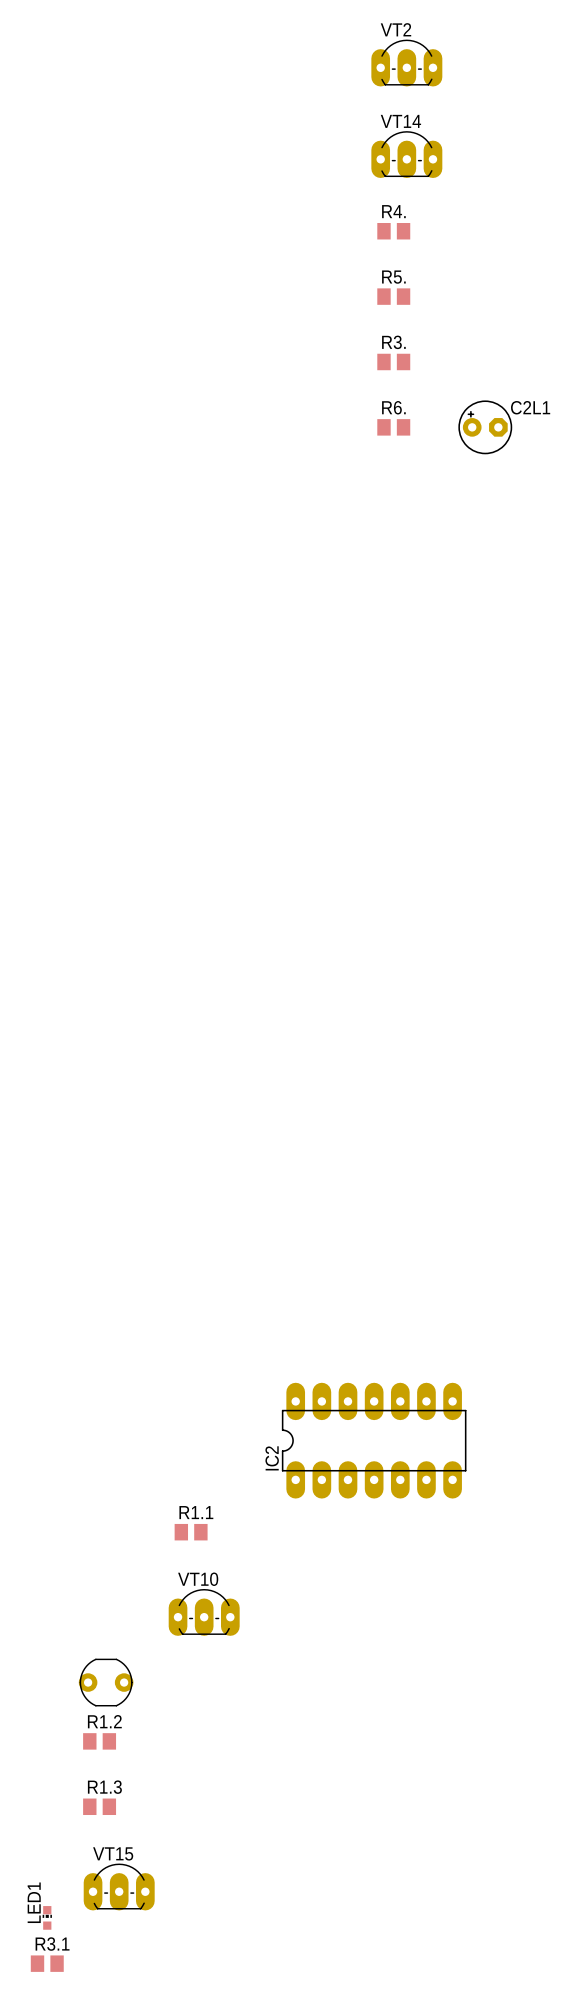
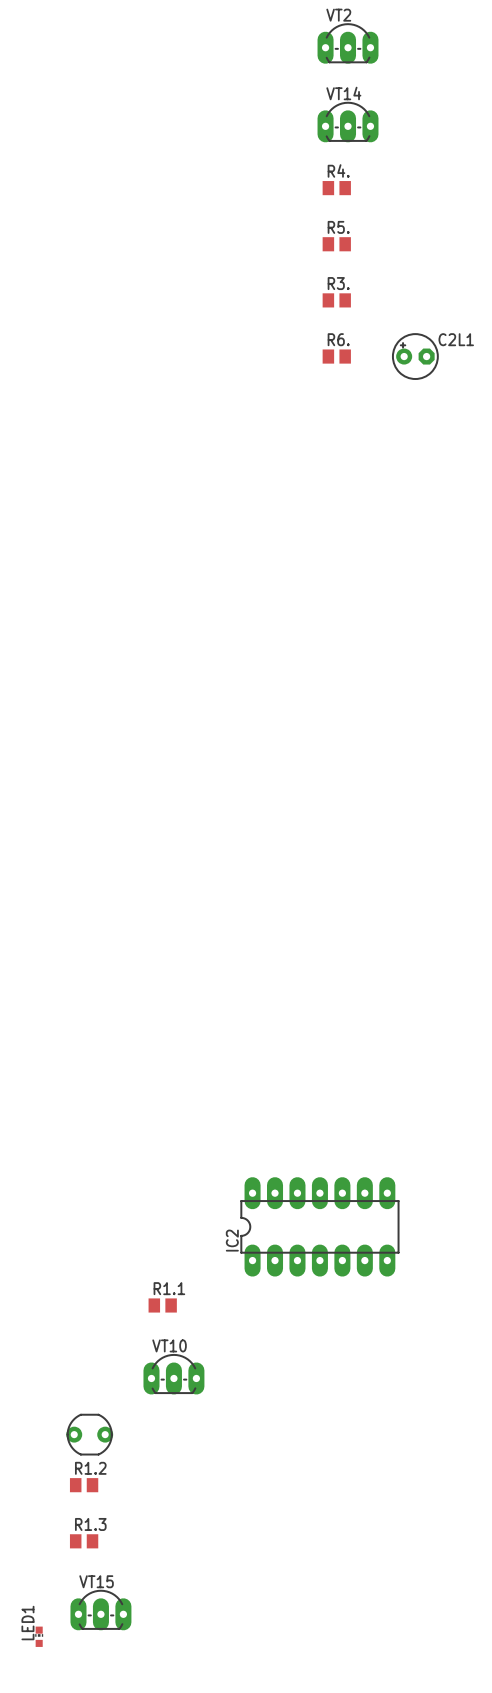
R3.1: (47, 1963) -> none

